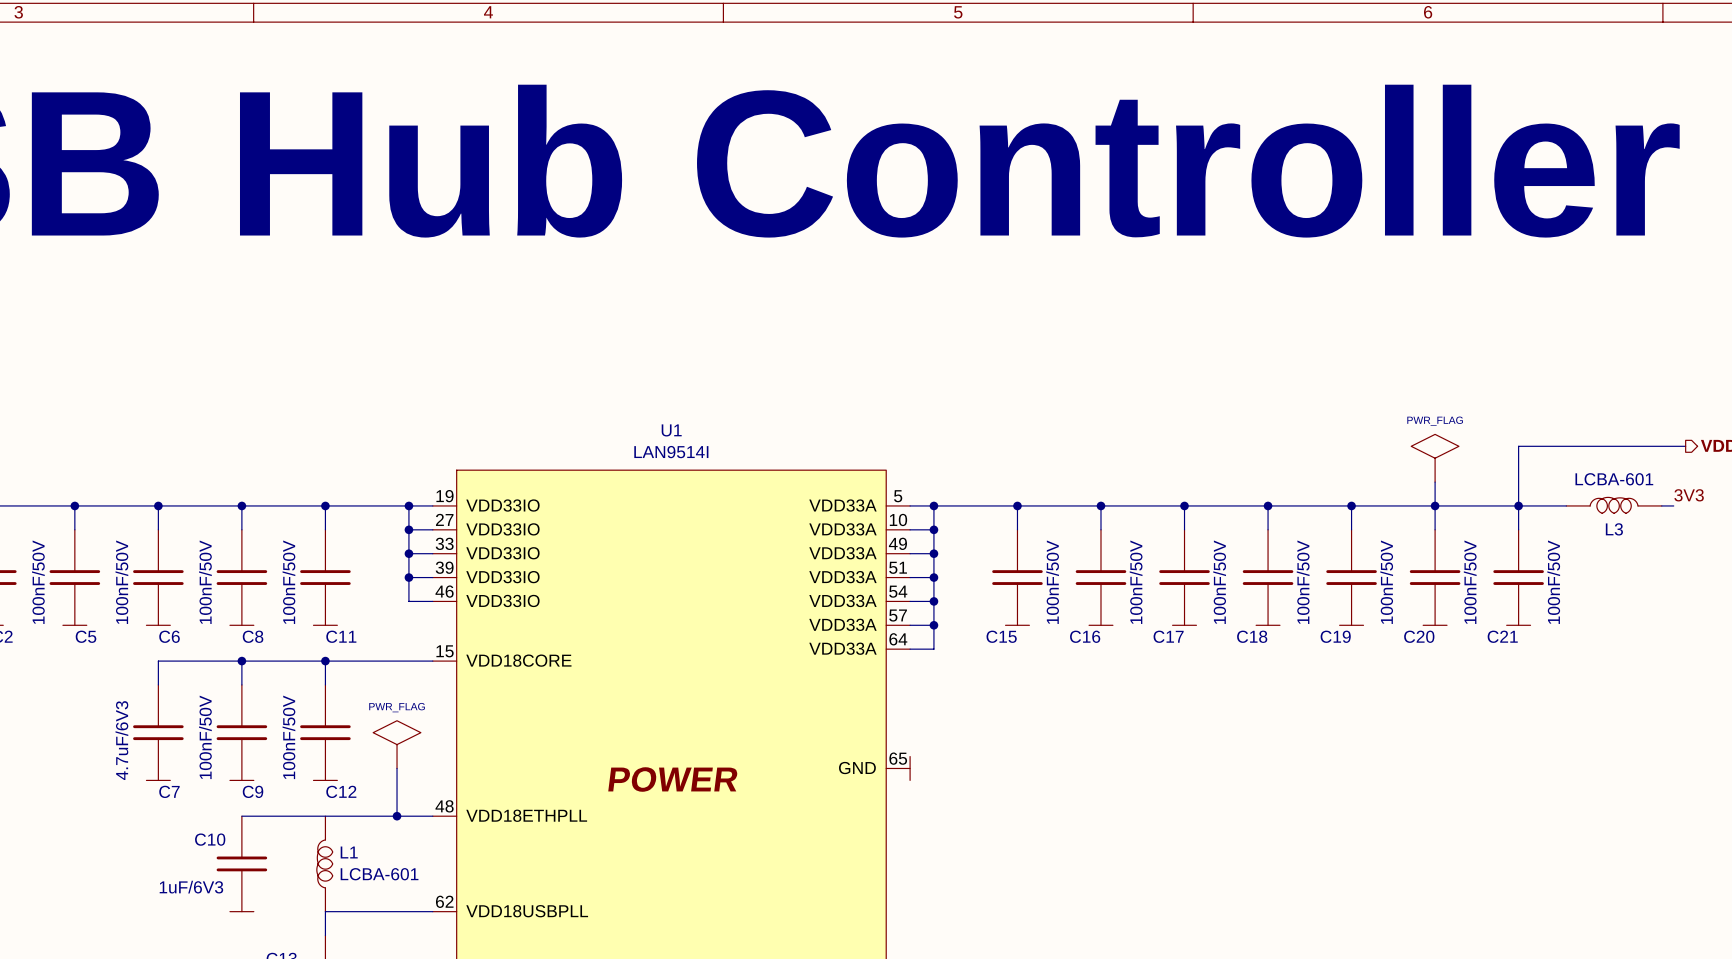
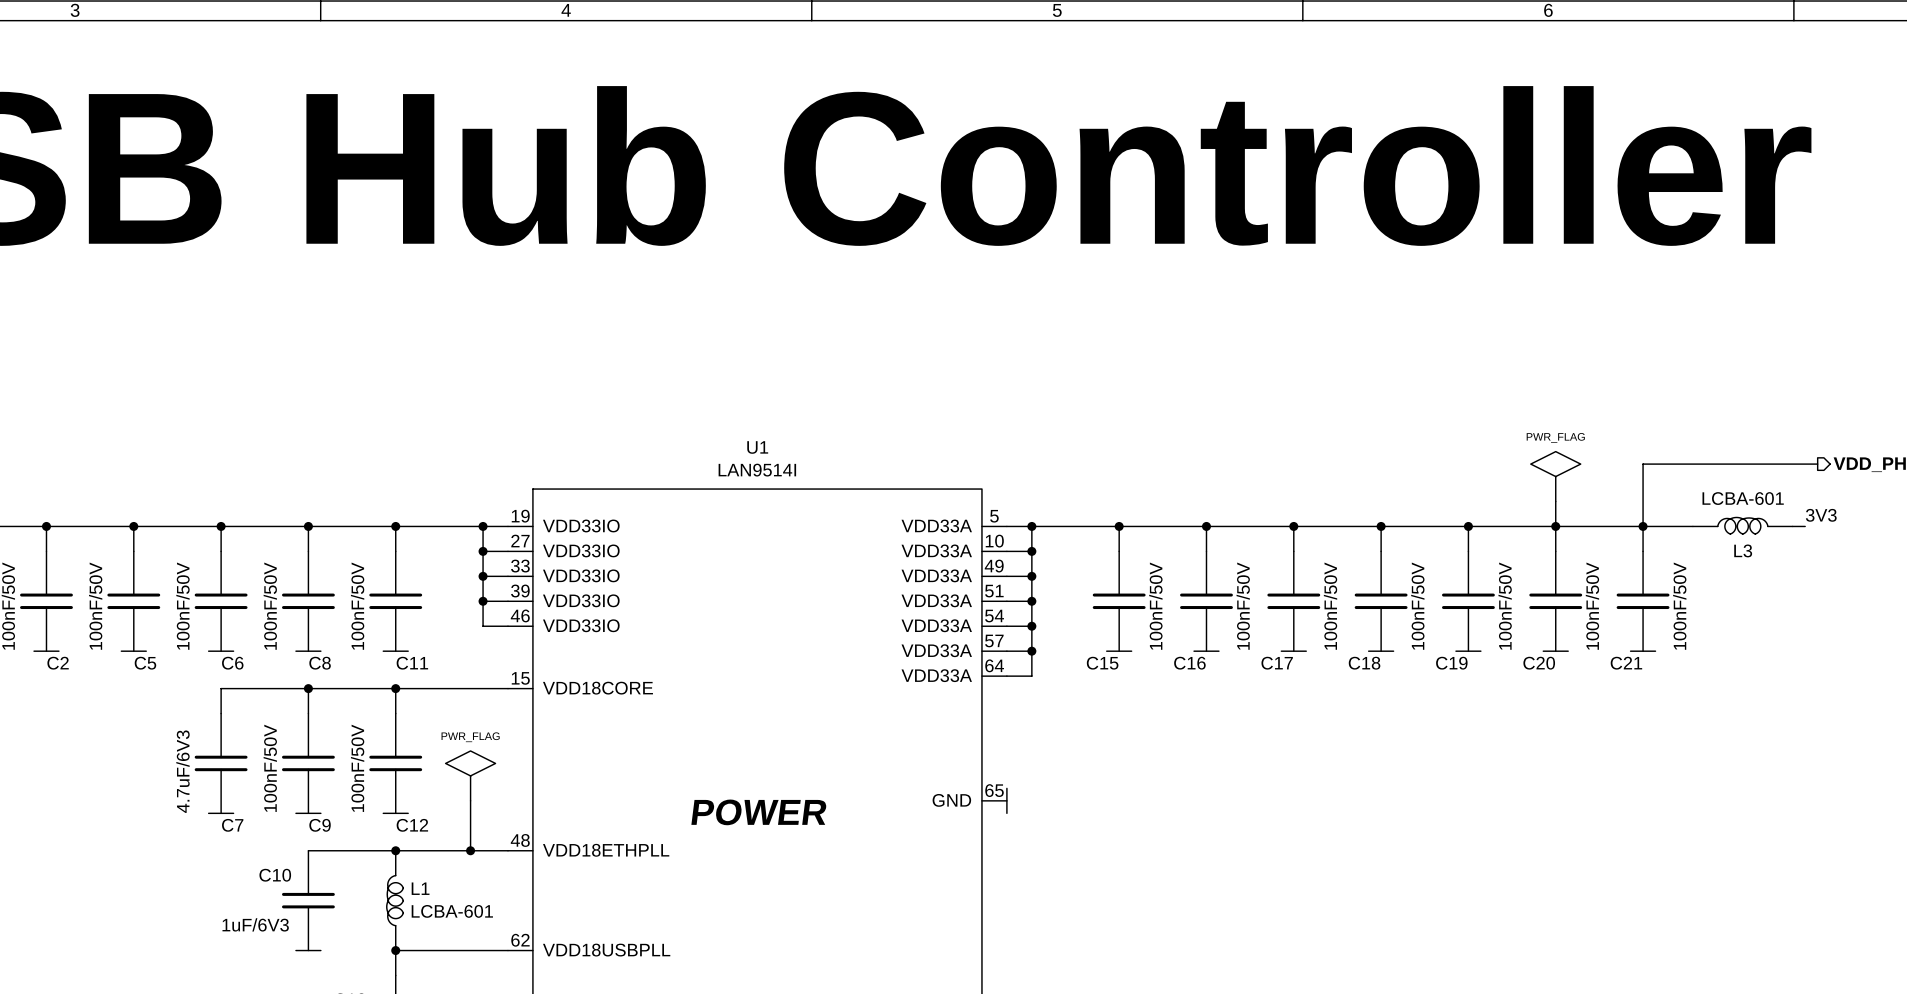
junction: none -> (395, 850)
junction: none -> (395, 950)

